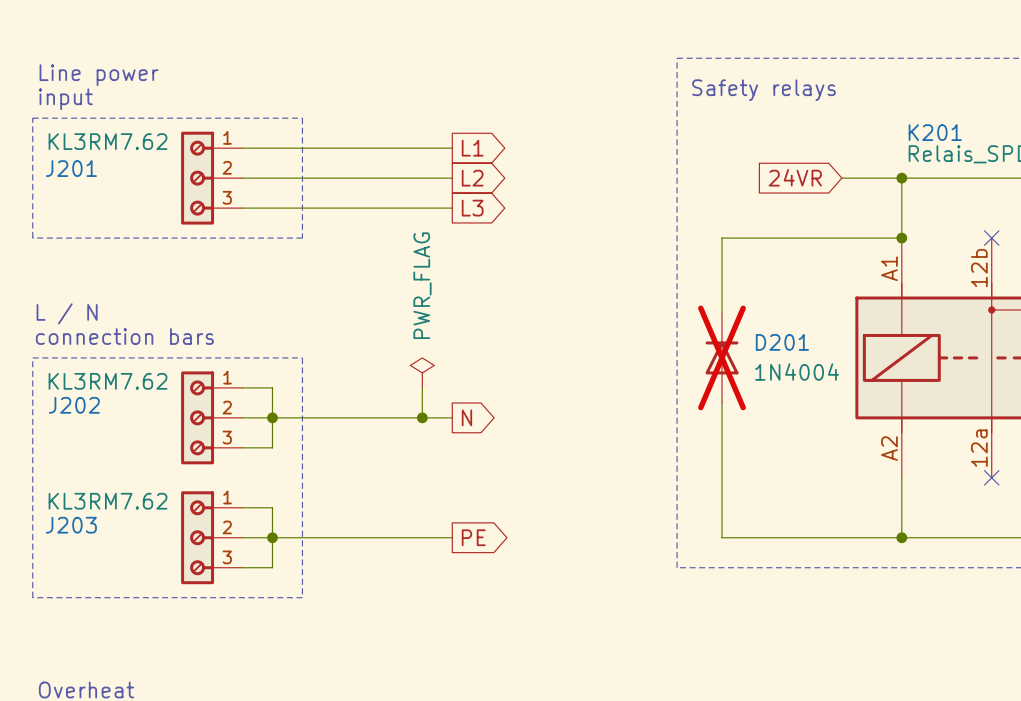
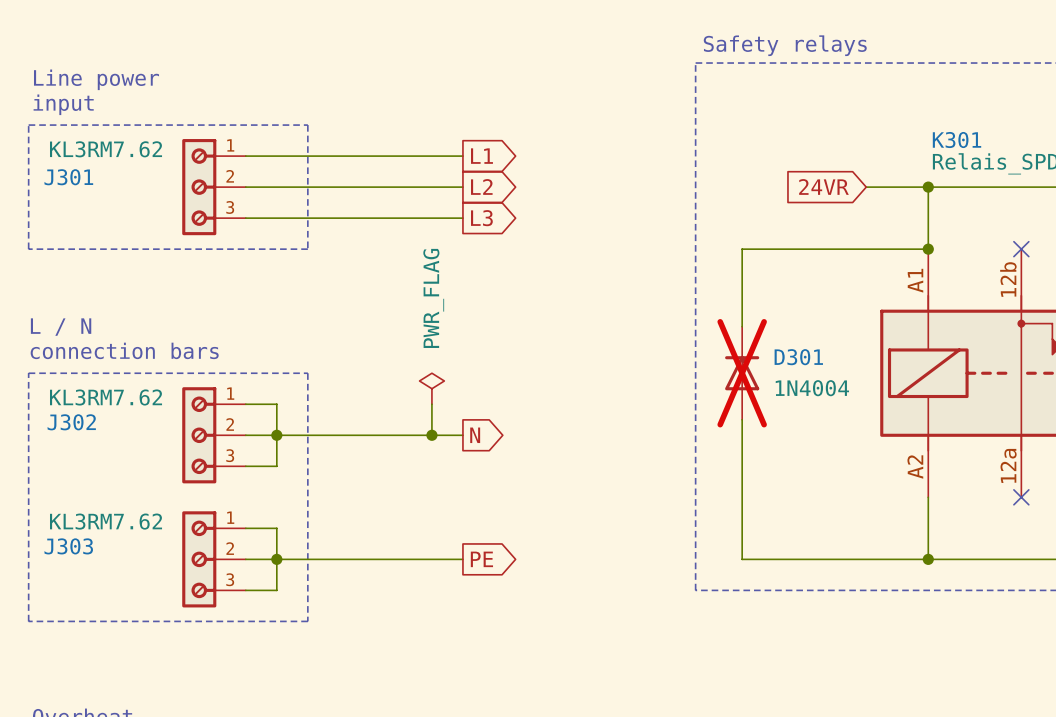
text position: Safety relays (763, 90) -> Safety relays (785, 45)
K201 name: K201 (935, 132) -> K301 (957, 140)
J201 name: J201 (71, 168) -> J301 (68, 177)
D201 name: D201 (782, 342) -> D301 (798, 357)
J202 name: J202 (74, 405) -> J302 (71, 422)
J203 name: J203 (71, 525) -> J303 (68, 546)

